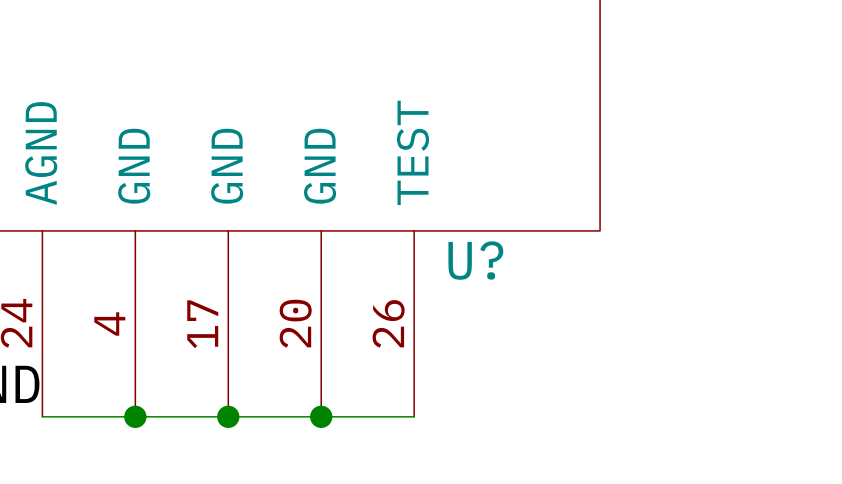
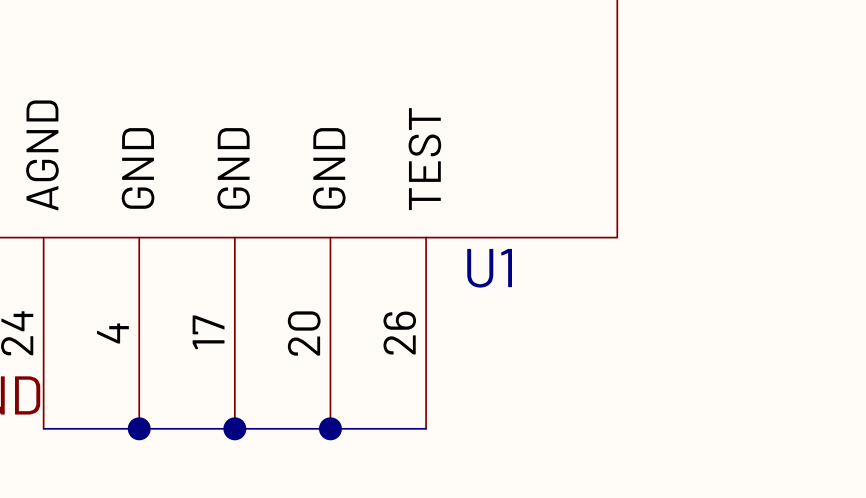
U? name: U? (475, 260) -> U1 (489, 268)

